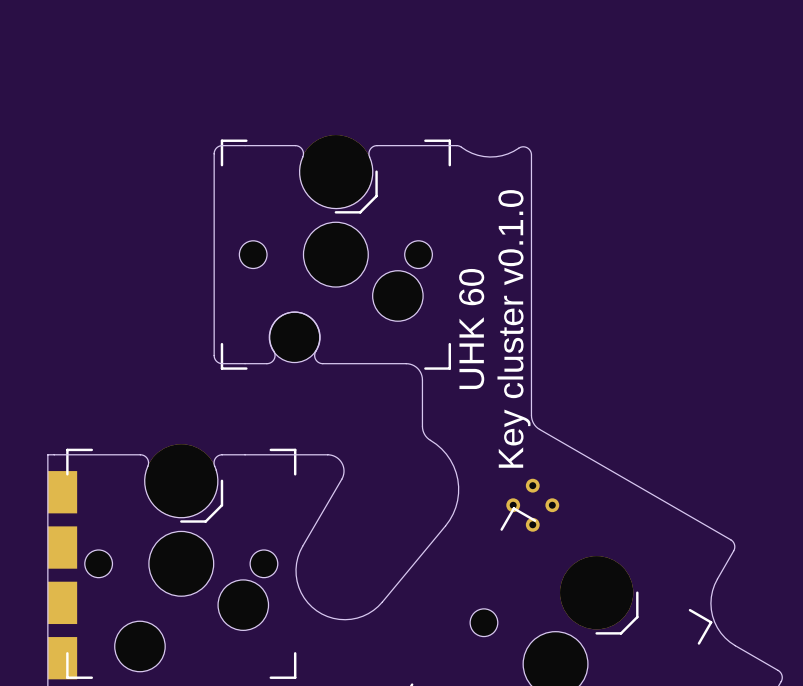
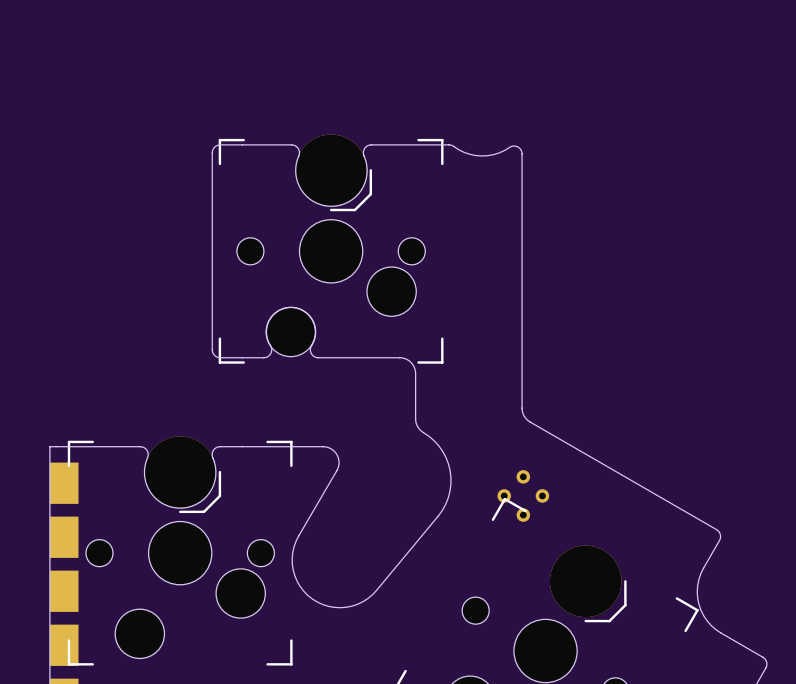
text: UHK 60 (471, 328) -> none
text: Key cluster v0.1.0 (514, 328) -> none

